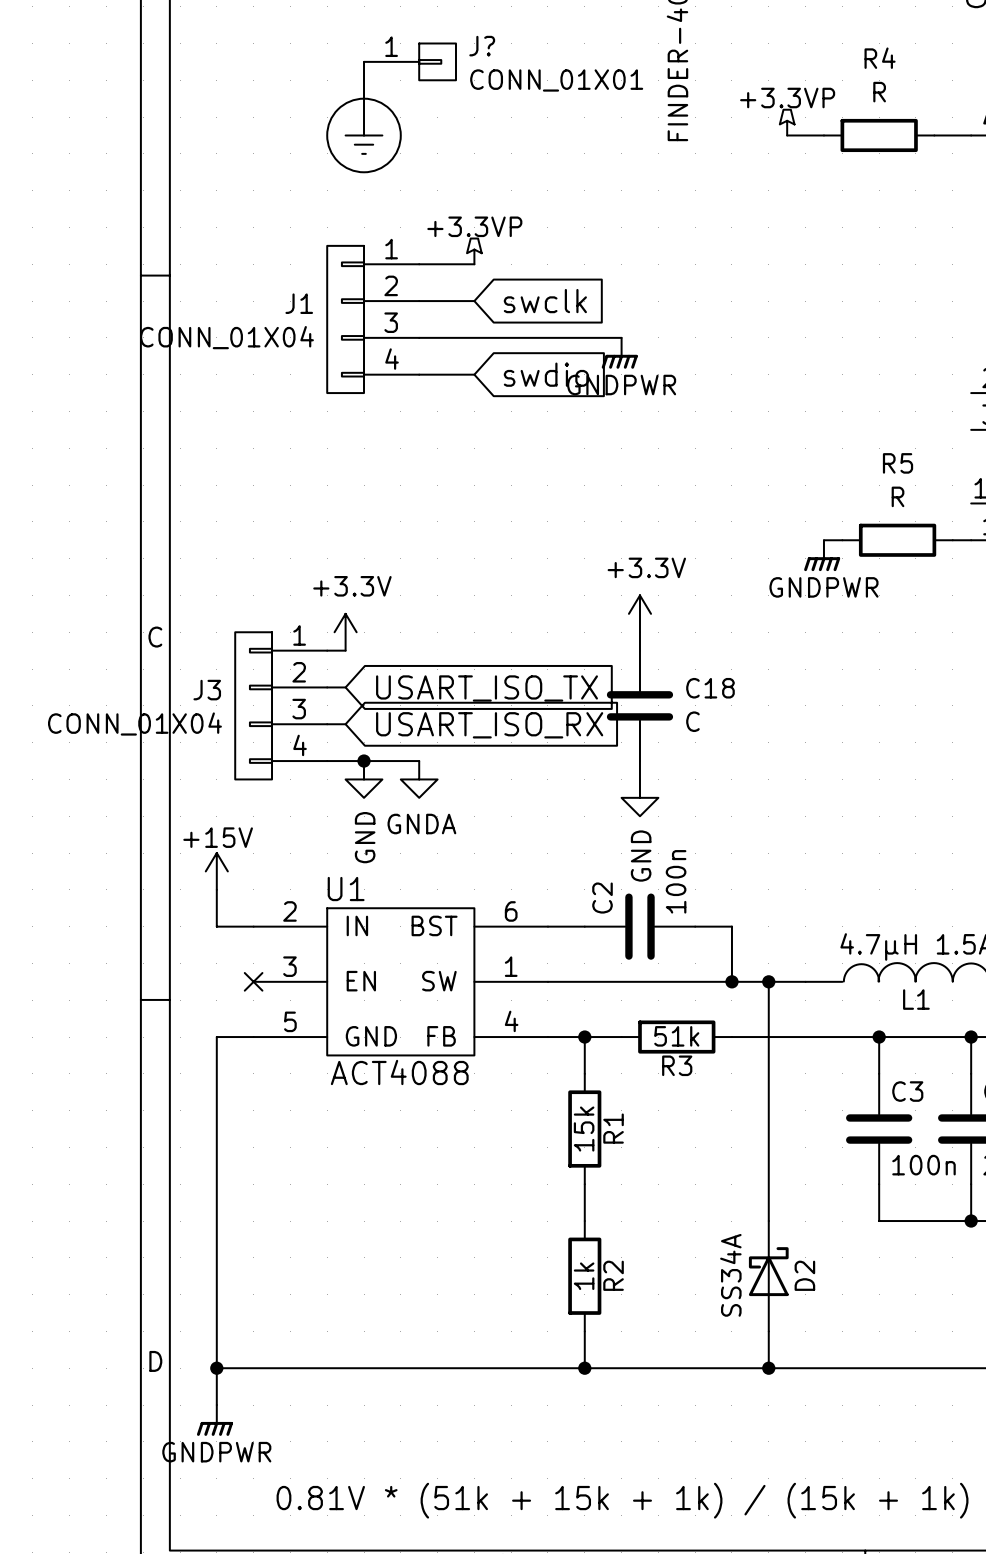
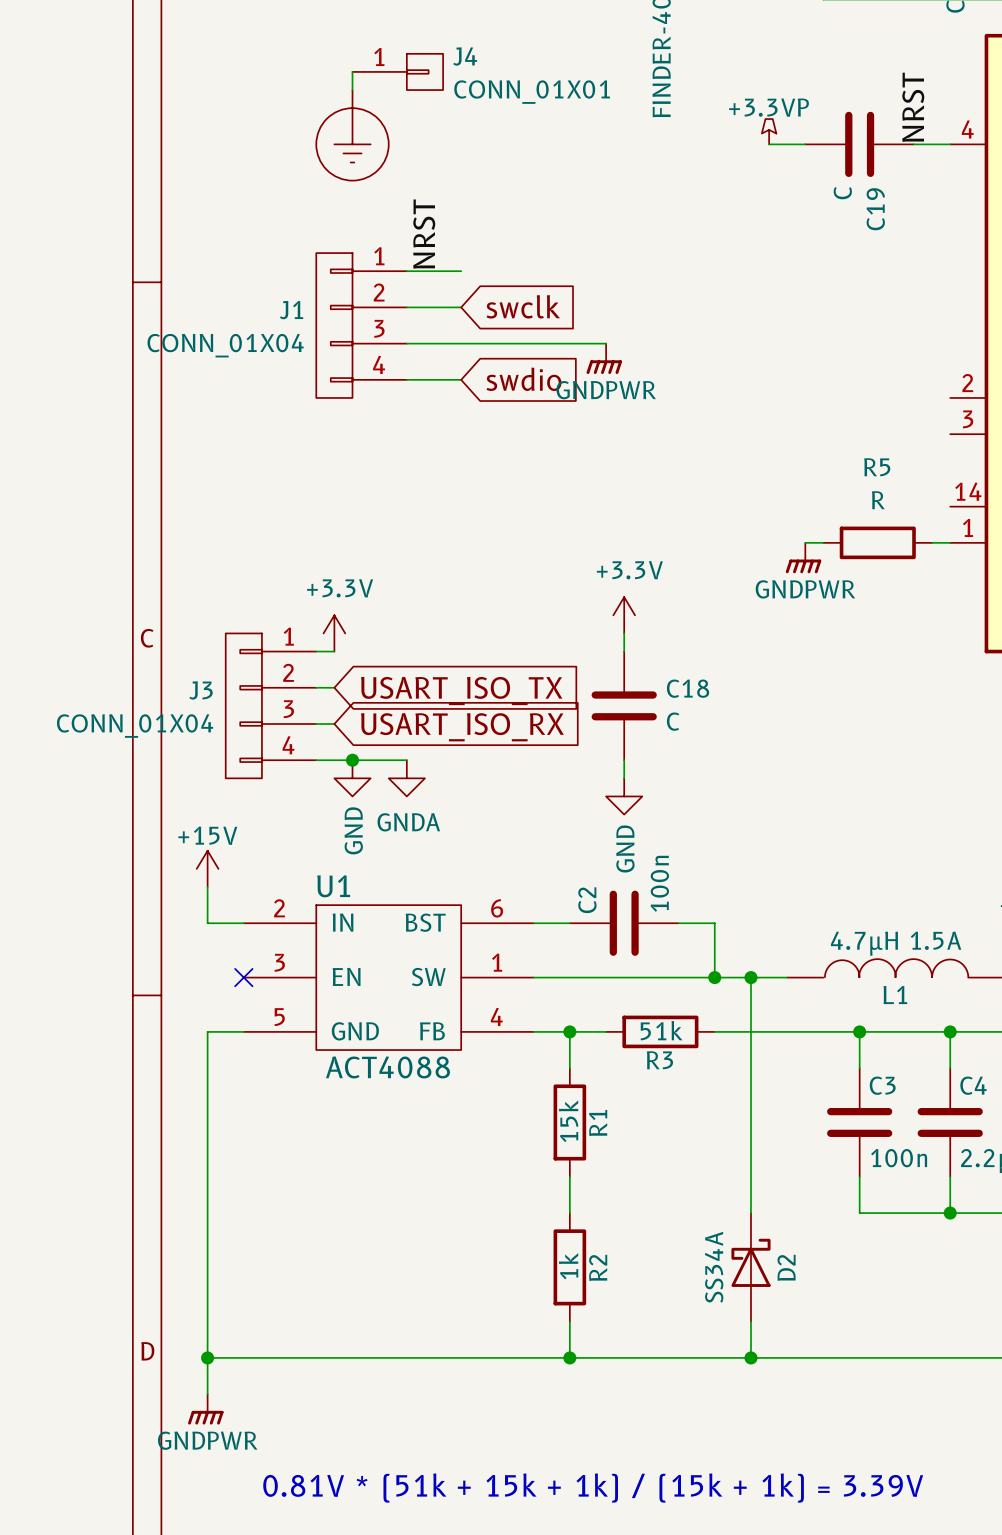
J? name: J? (482, 46) -> J4 (465, 56)
label: none -> NRST (913, 107)
R4: R (879, 135) -> none
C19: none -> C (859, 144)
label: none -> NRST (424, 234)
power symbol: +3.3VP (474, 251) -> none

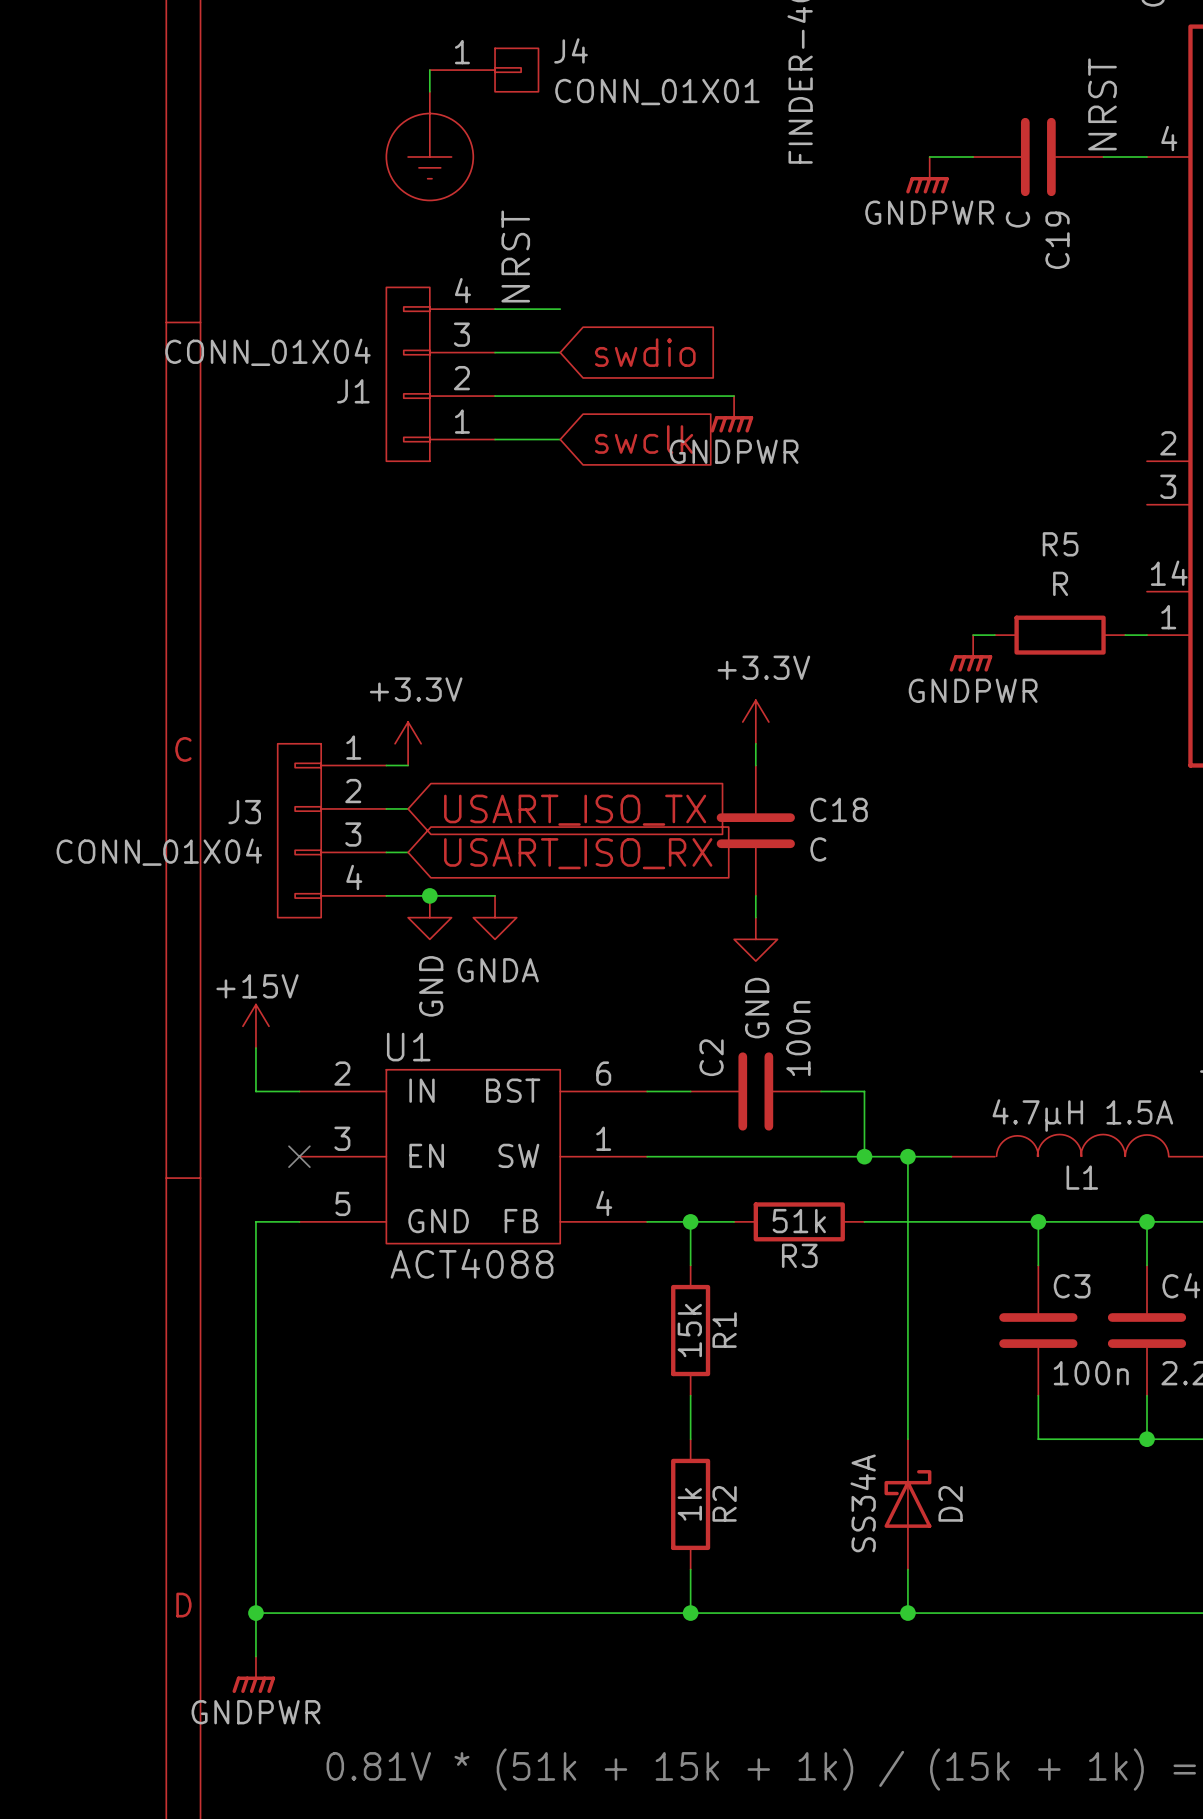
power symbol: +3.3VP (769, 131) -> none
power symbol: none -> GNDPWR (927, 175)
global label: swclk (523, 306) -> swdio (645, 352)
J1 flip: as is (334, 325) -> up-down (408, 374)
global label: swdio (523, 379) -> swclk (644, 439)

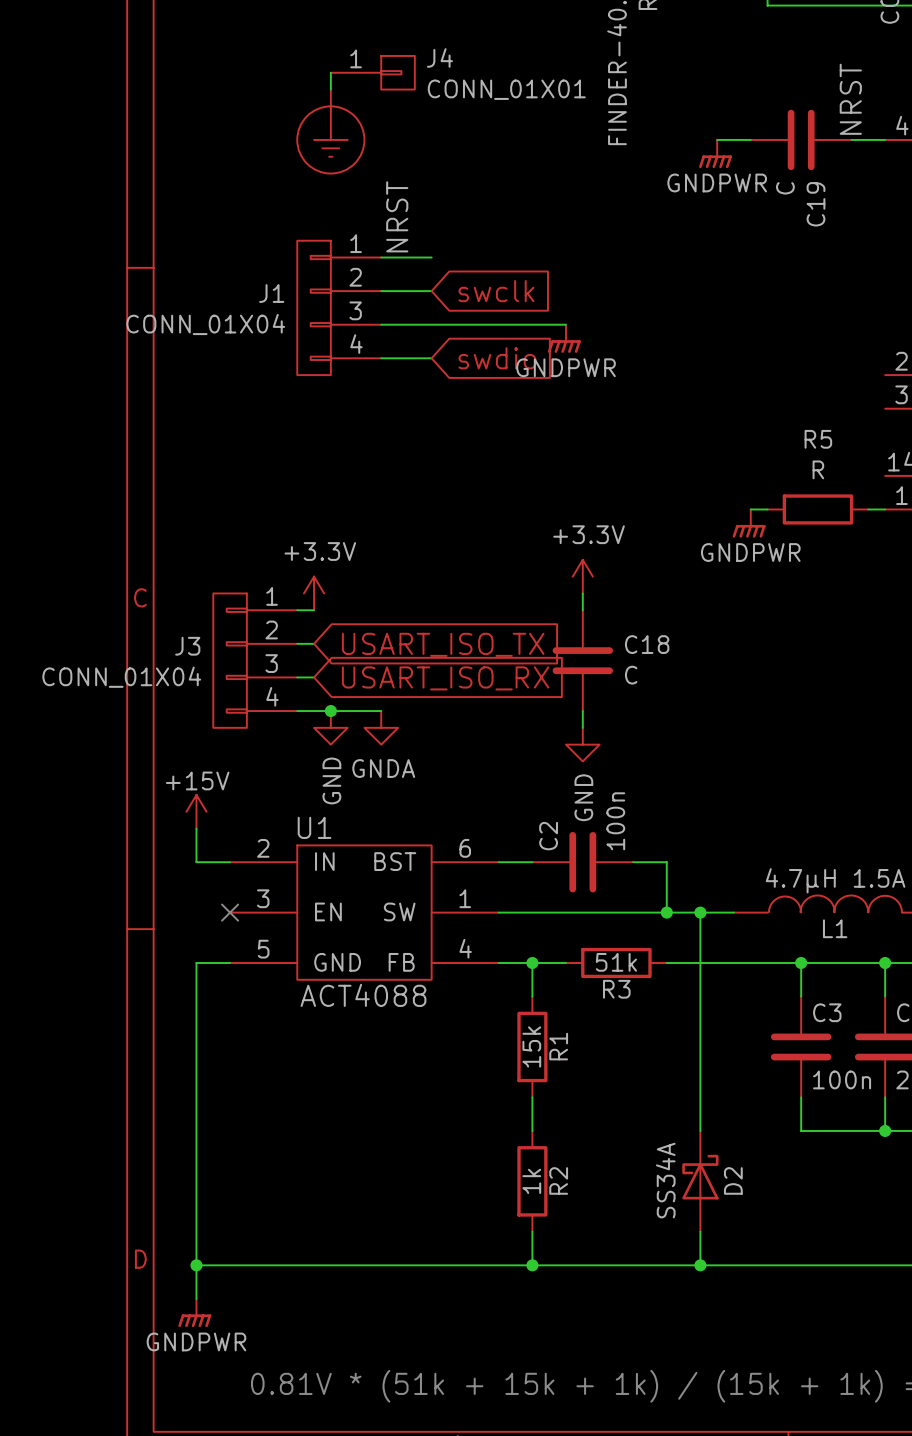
global label: swdio (645, 352) -> swclk (496, 291)
J1 flip: as is (408, 374) -> up-down (314, 307)
global label: swclk (644, 439) -> swdio (497, 358)

